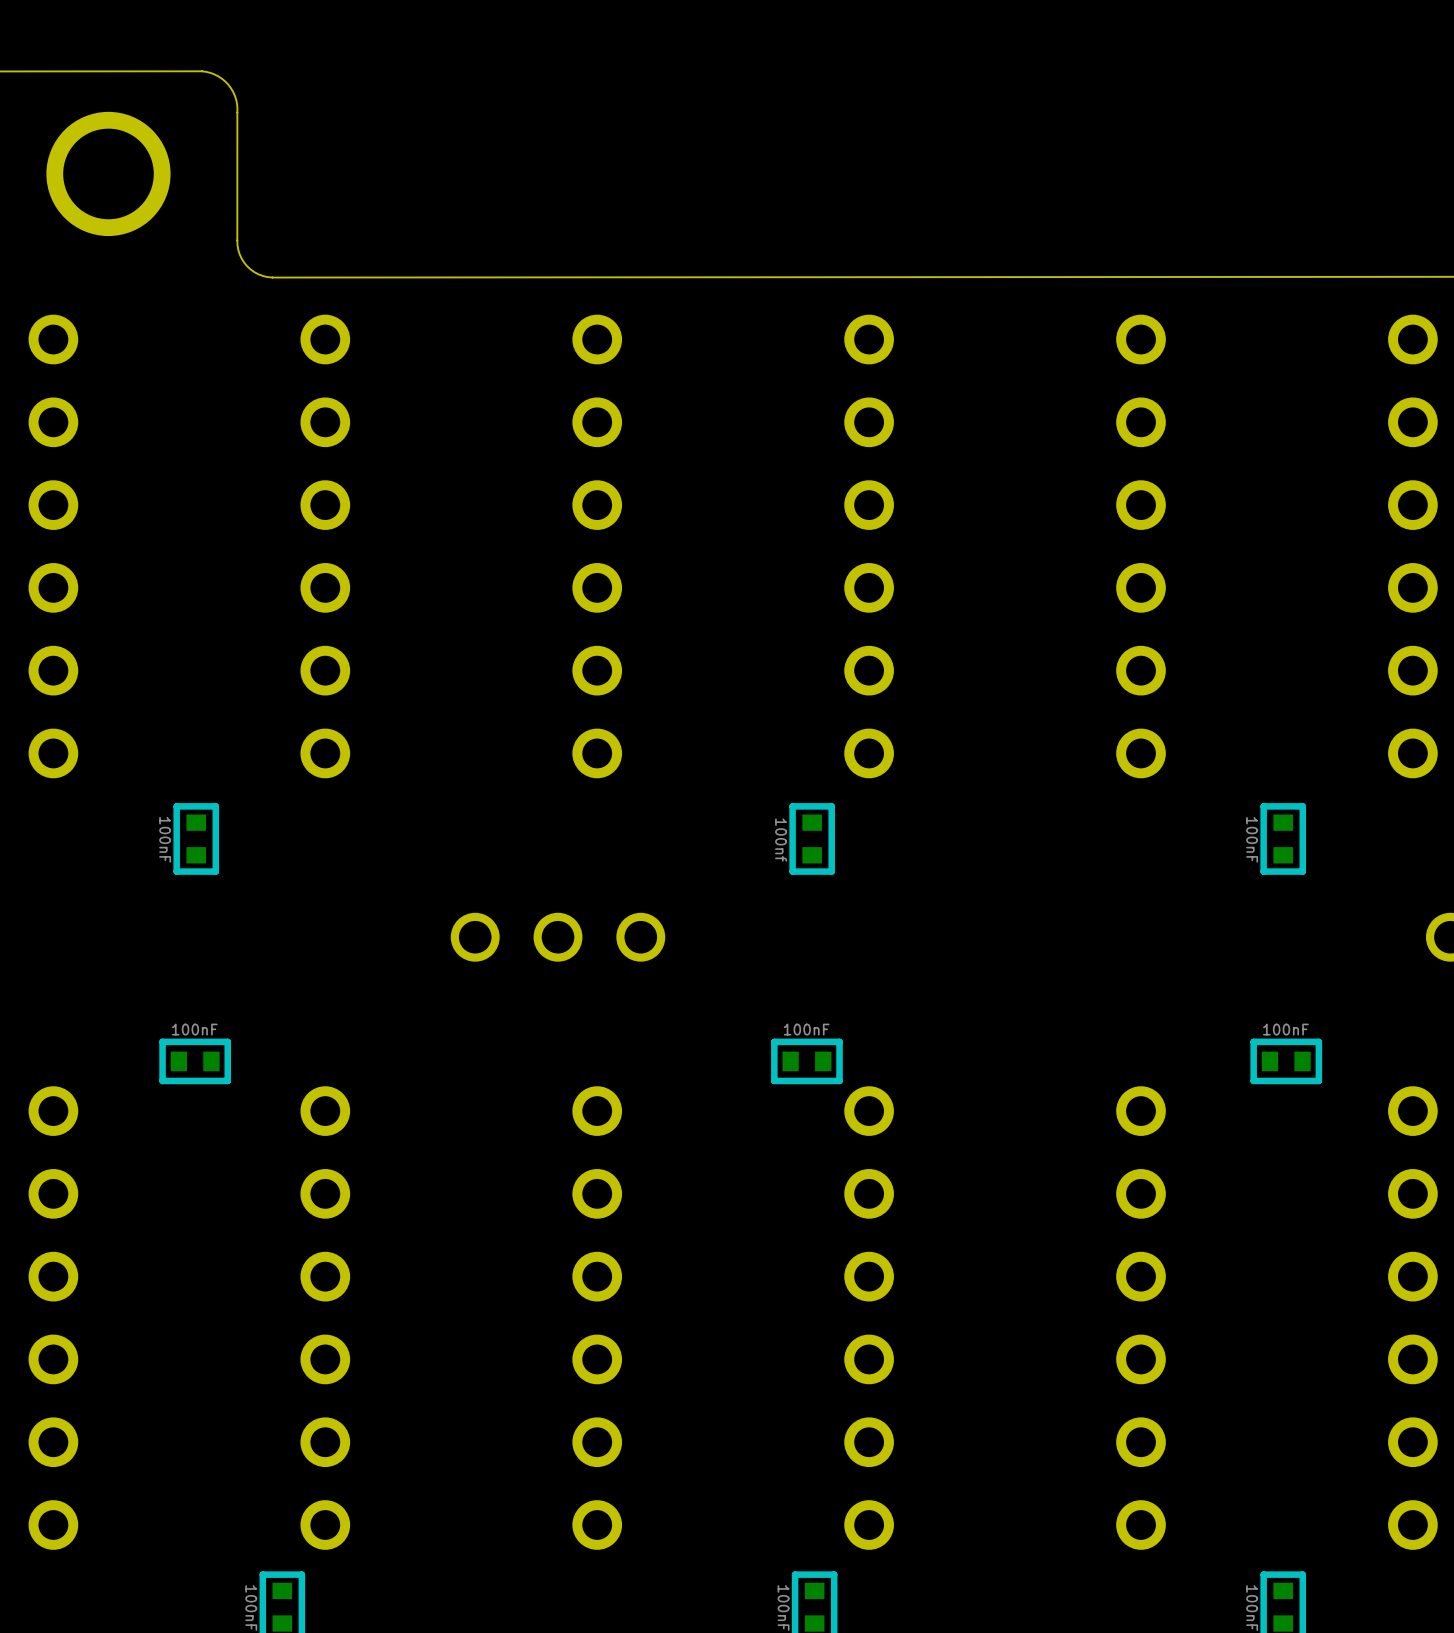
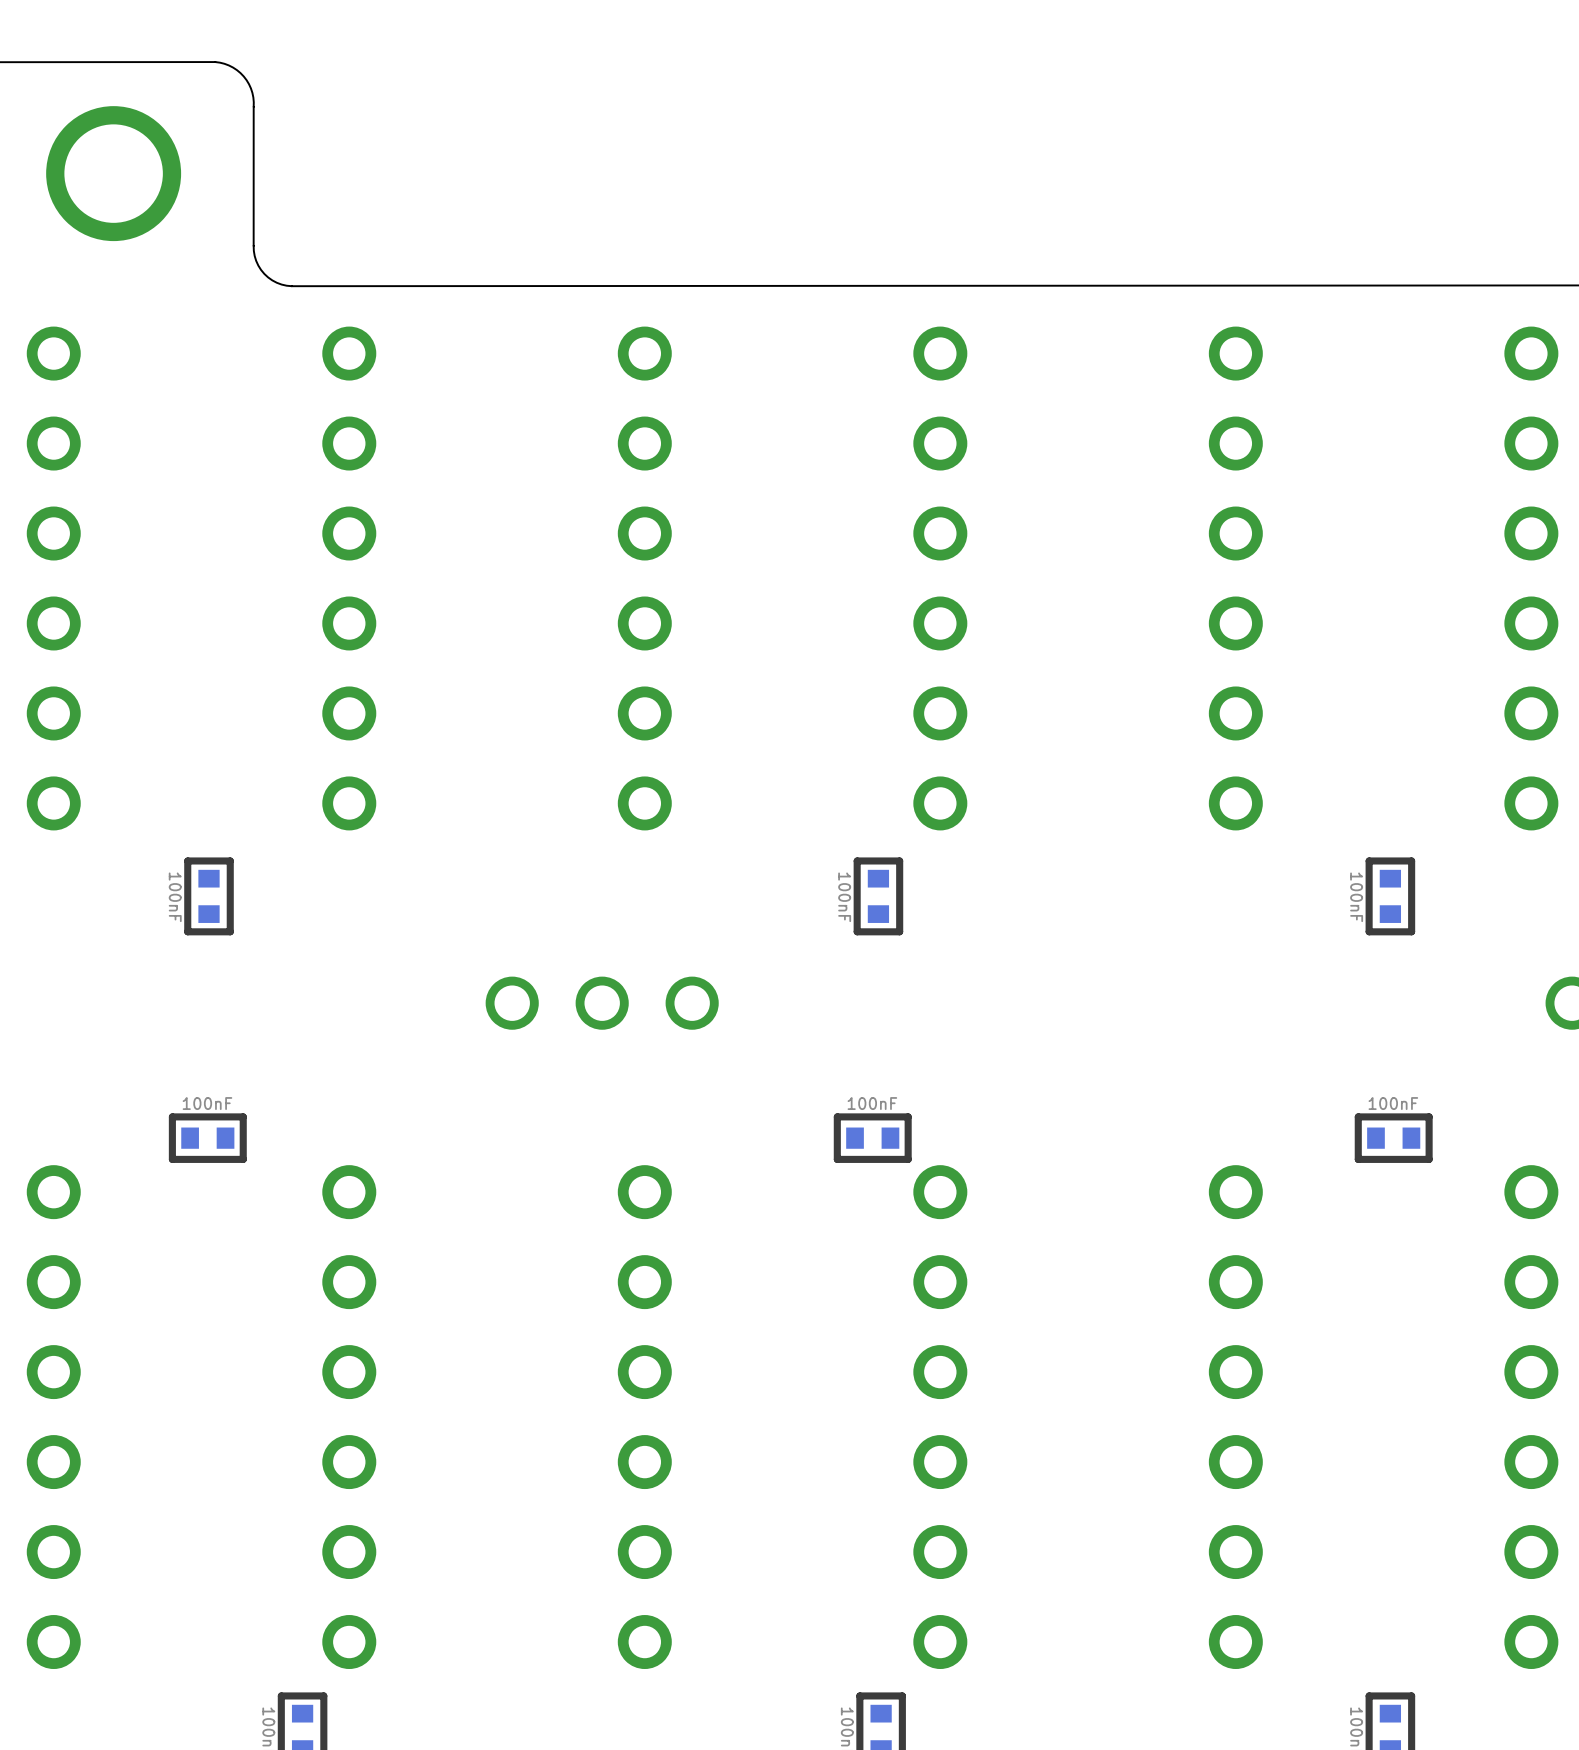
part value: 100nf (781, 840) -> 100nF (844, 897)

